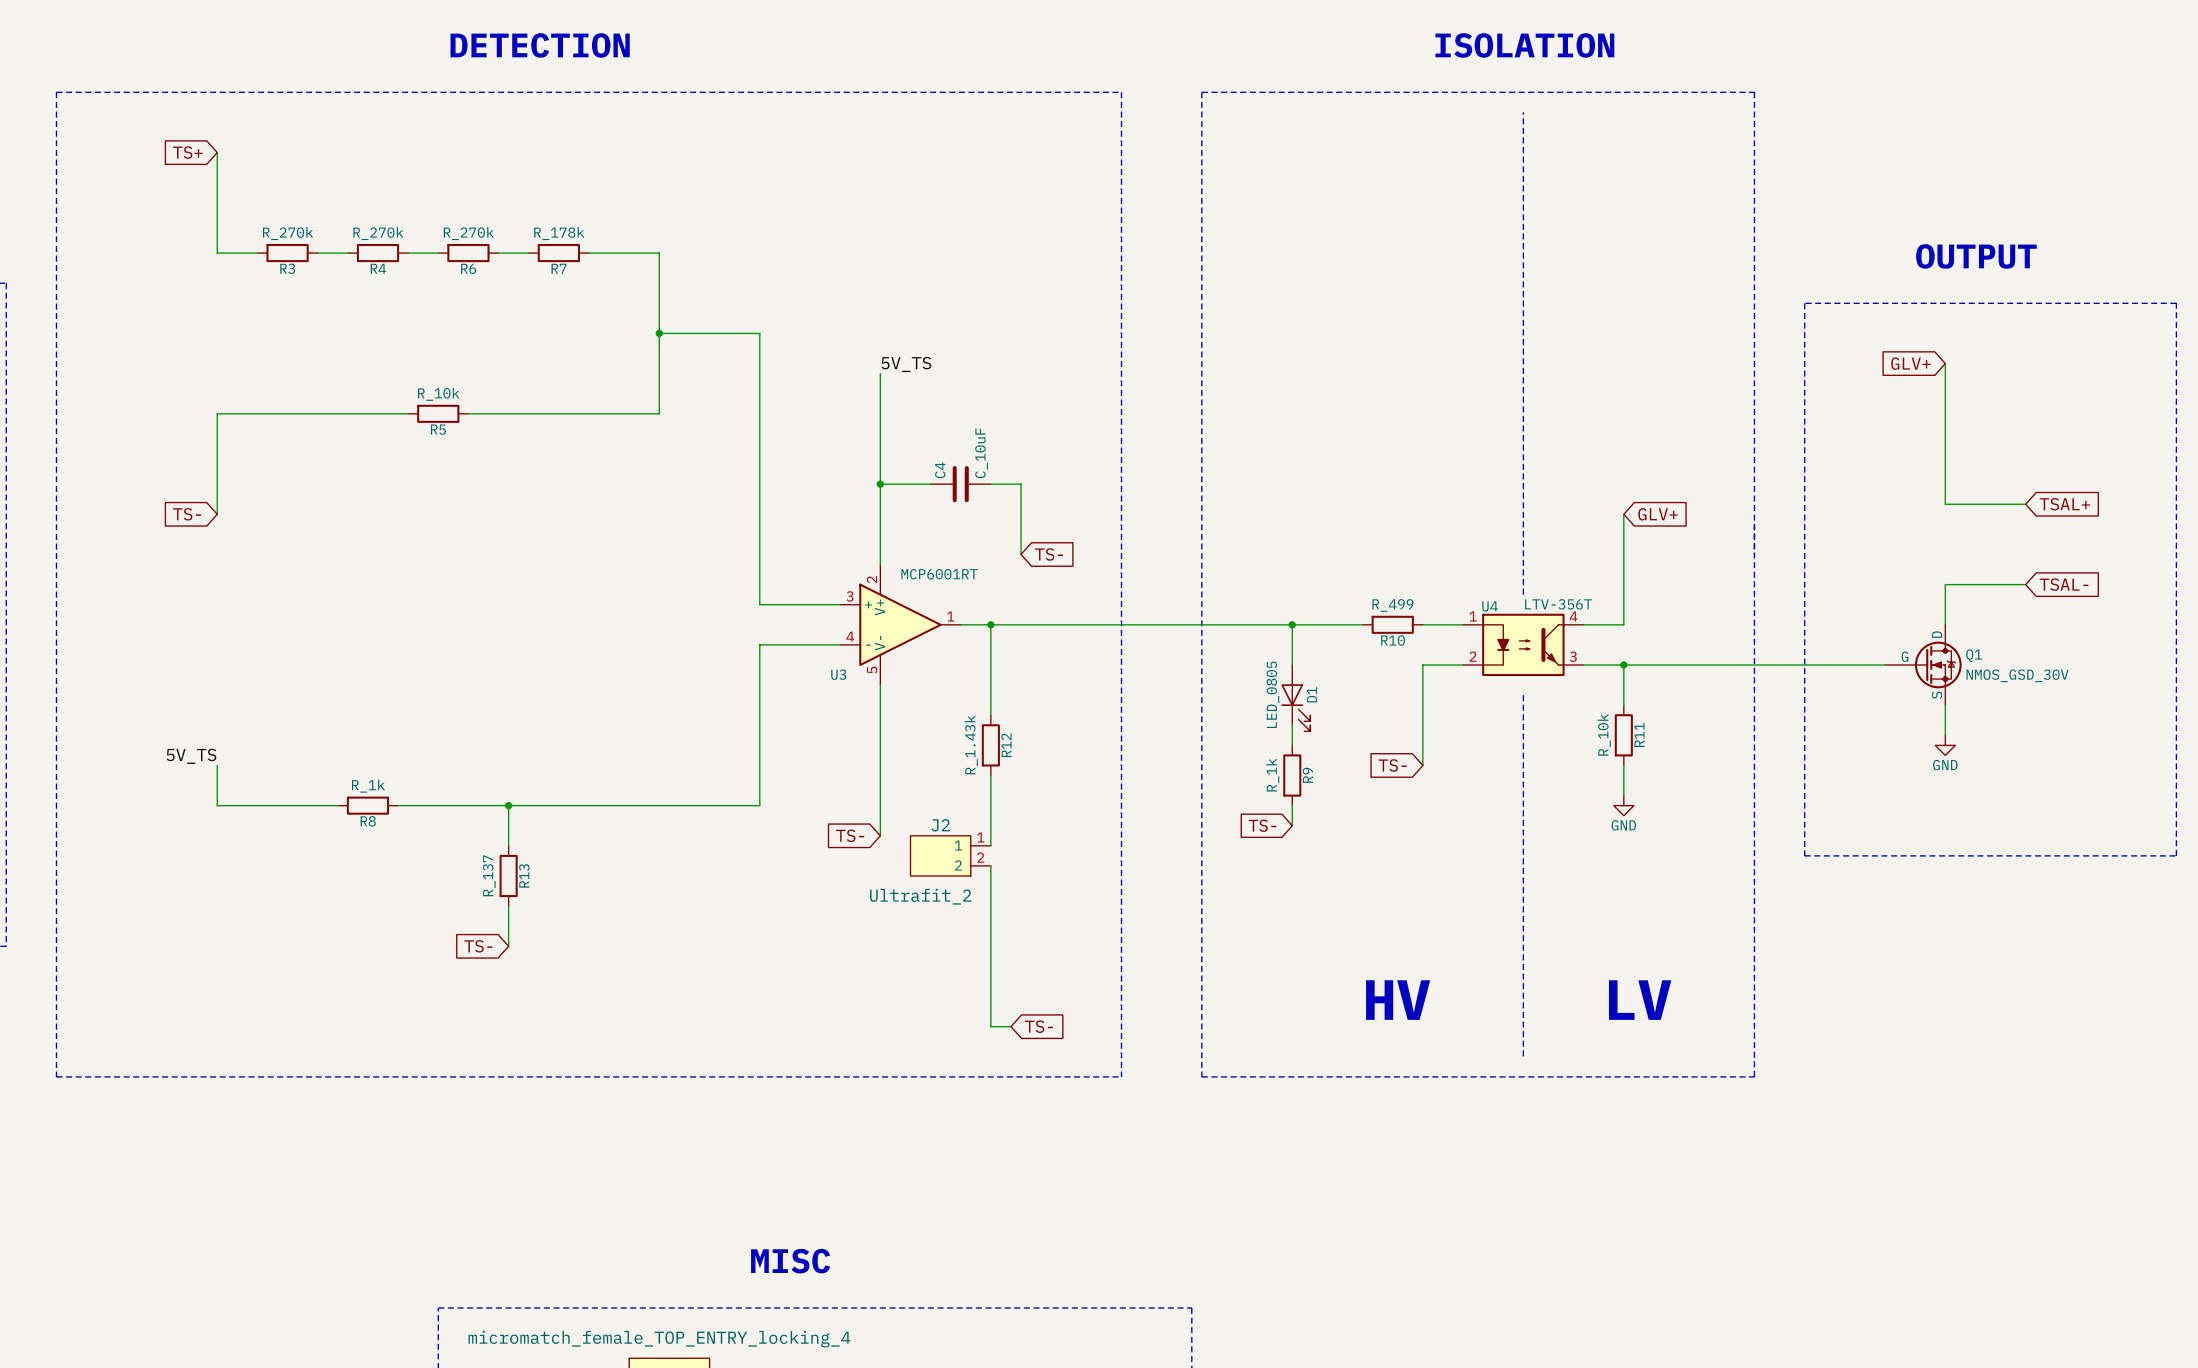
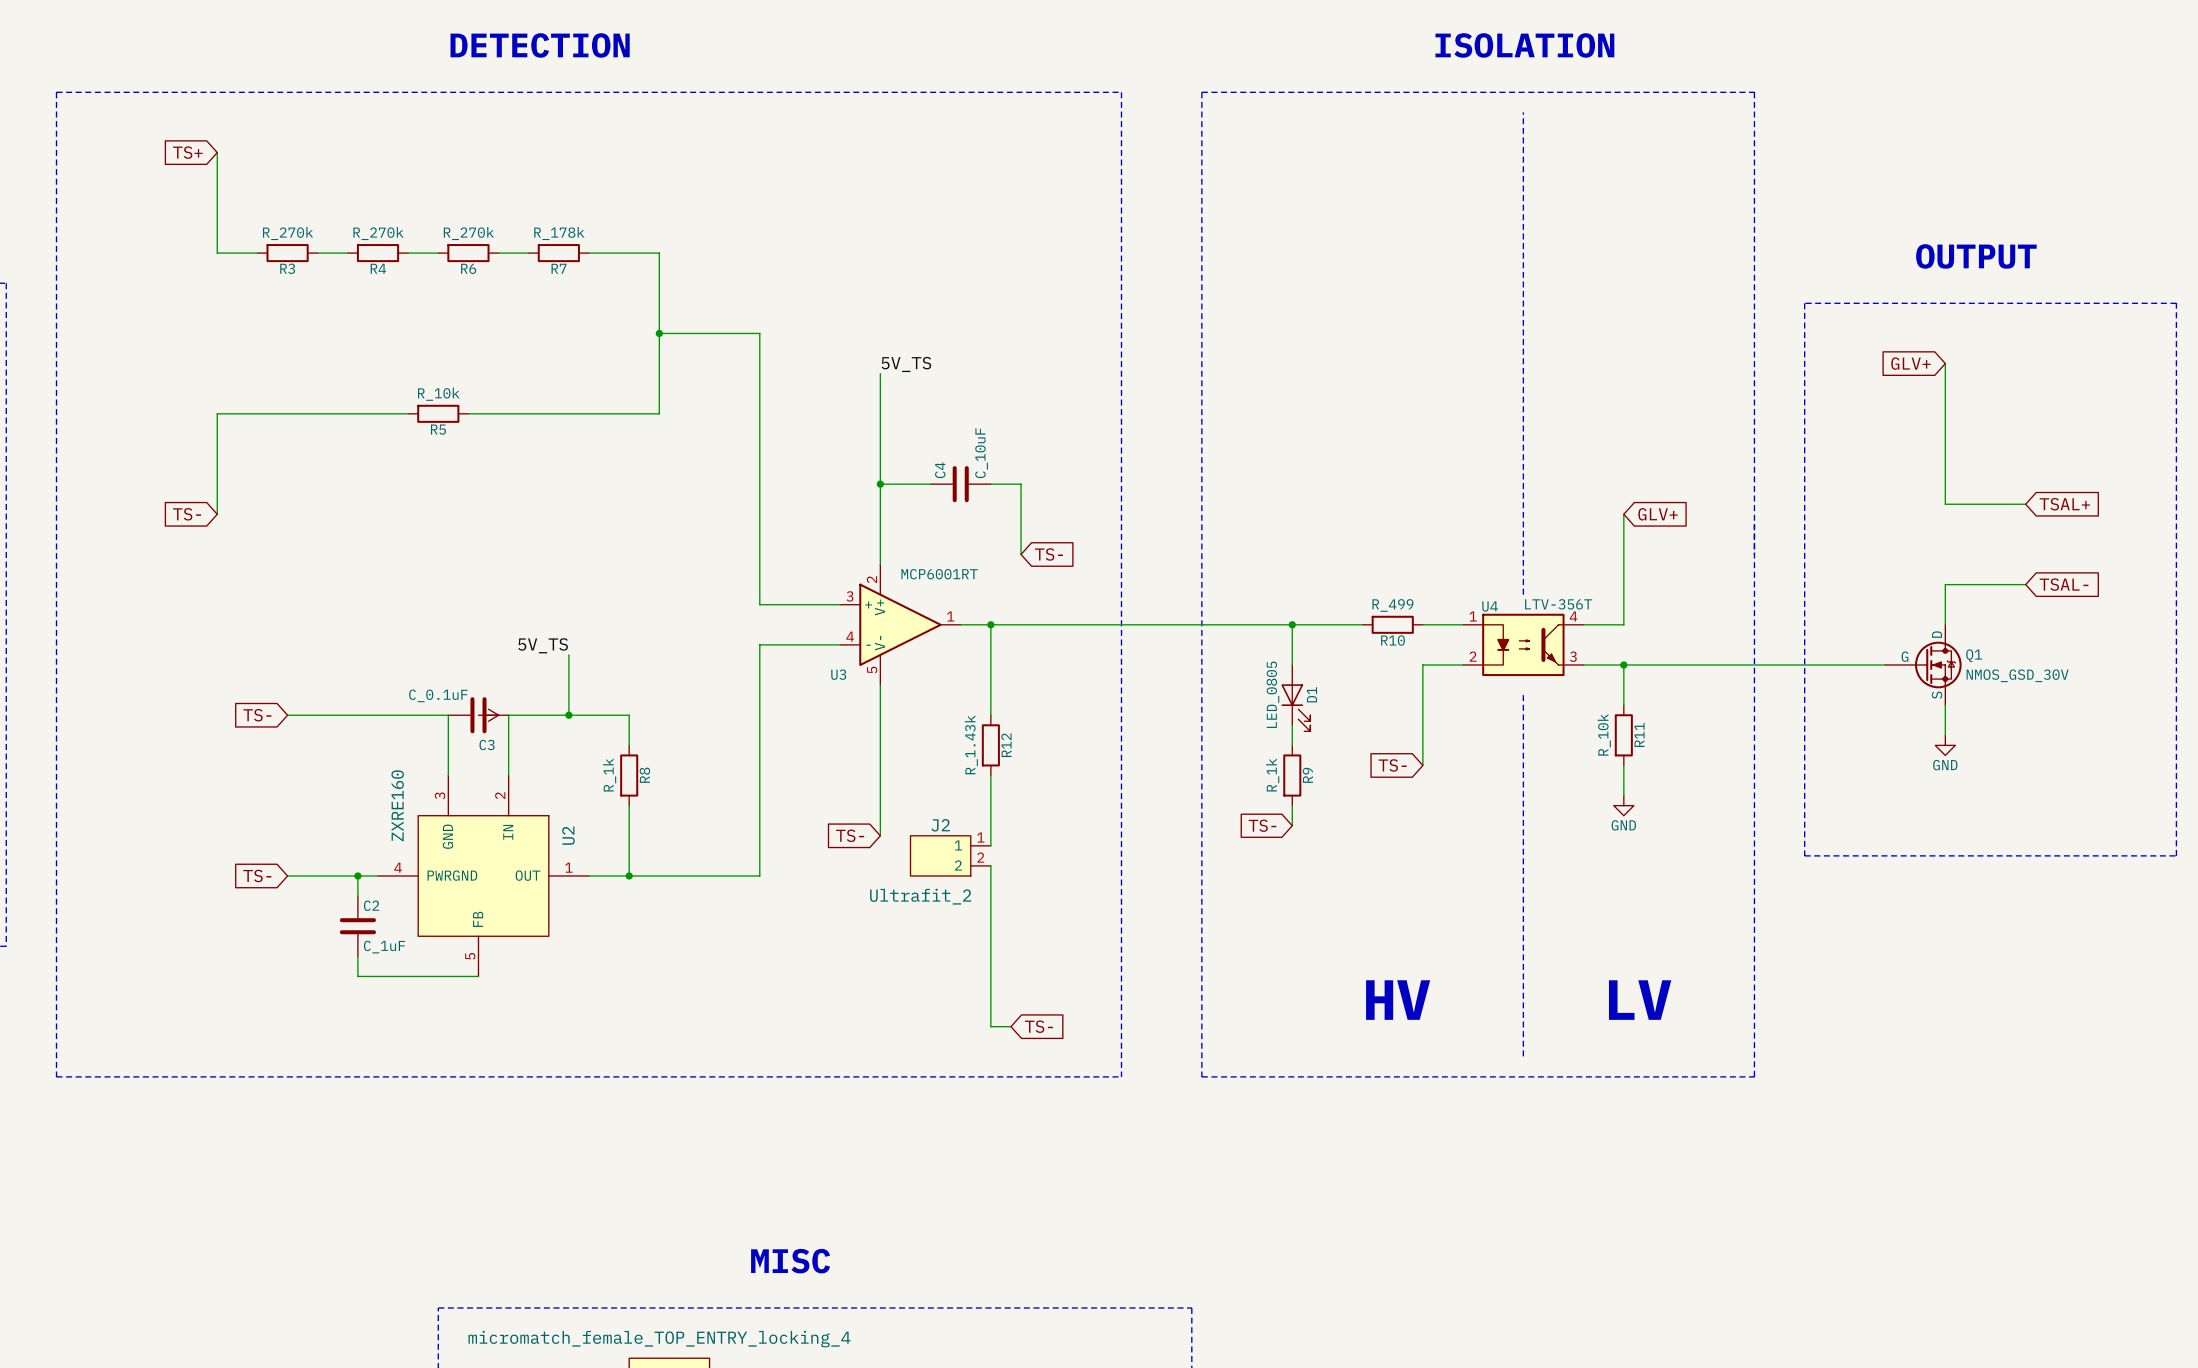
label: none -> 5V_TS (543, 645)
wire: none -> (568, 654) (568, 715)
global label: none -> TS- (257, 715)
wire: none -> (287, 715) (448, 715) (448, 775)
C3: none -> C_0.1uF (478, 715)
junction: none -> (568, 715)
wire: none -> (629, 745) (629, 715) (508, 715) (508, 775)
label: 5V_TS (191, 756) -> none
wire: (217, 765) (217, 805) (337, 805) -> none
R8 value position: R_1k (368, 786) -> R_1k (609, 775)
R8 rotation: 0° (367, 805) -> 90° clockwise (629, 775)
R8 position: (367, 805) -> (629, 775)
wire: (398, 805) (759, 805) -> (589, 875) (759, 875) (759, 805)
junction: (508, 805) -> none
wire: none -> (629, 805) (629, 875)
R8 name position: R8 (368, 821) -> R8 (644, 775)
global label: none -> TS- (257, 875)
wire: none -> (287, 875) (378, 875)
wire: none -> (357, 875) (357, 896)
junction: none -> (357, 875)
U2: none -> ZXRE160 (483, 875)
R13: R_137 (508, 875) -> none
junction: none -> (629, 875)
C2: none -> C_1uF (357, 926)
global label: TS- (478, 946) -> none
wire: none -> (357, 956) (357, 976) (478, 976)

